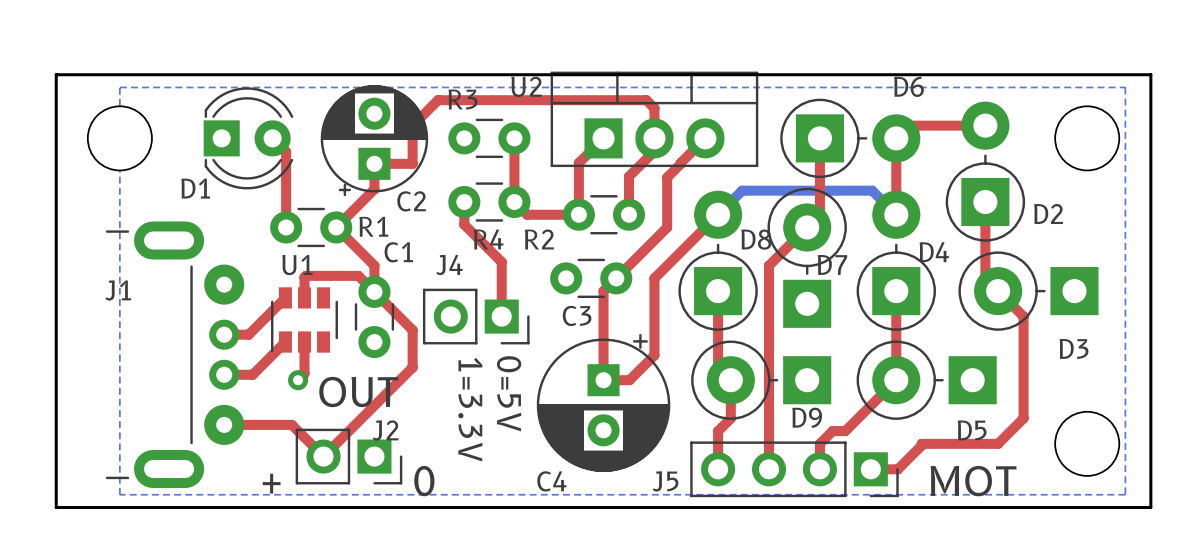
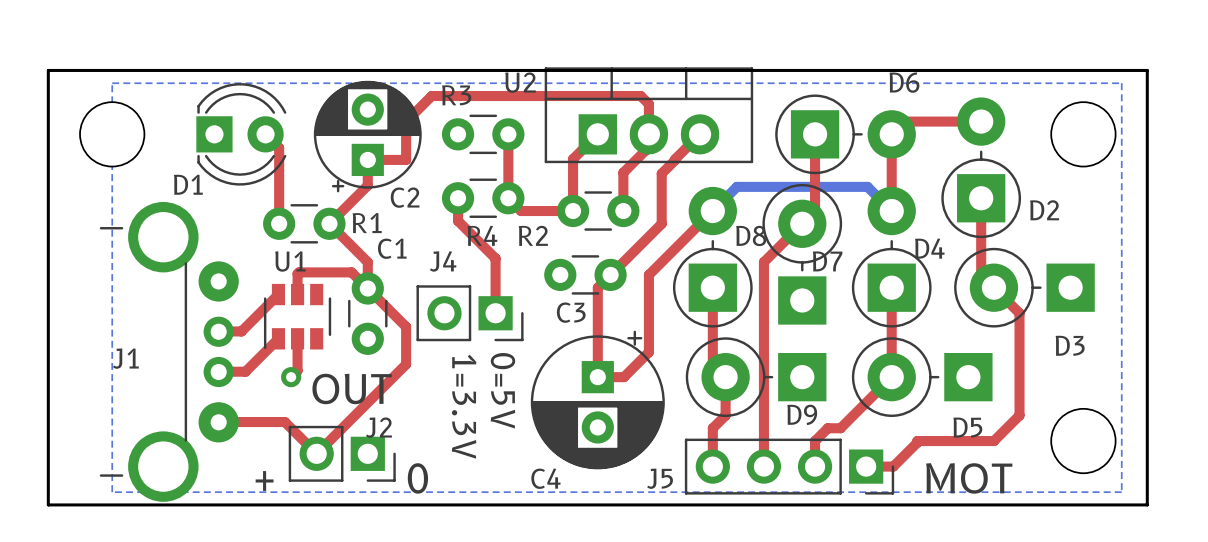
J1 footprint: [105, 221, 245, 489] -> [99, 201, 239, 502]
J1 name position: J1 (118, 290) -> J1 (125, 358)

